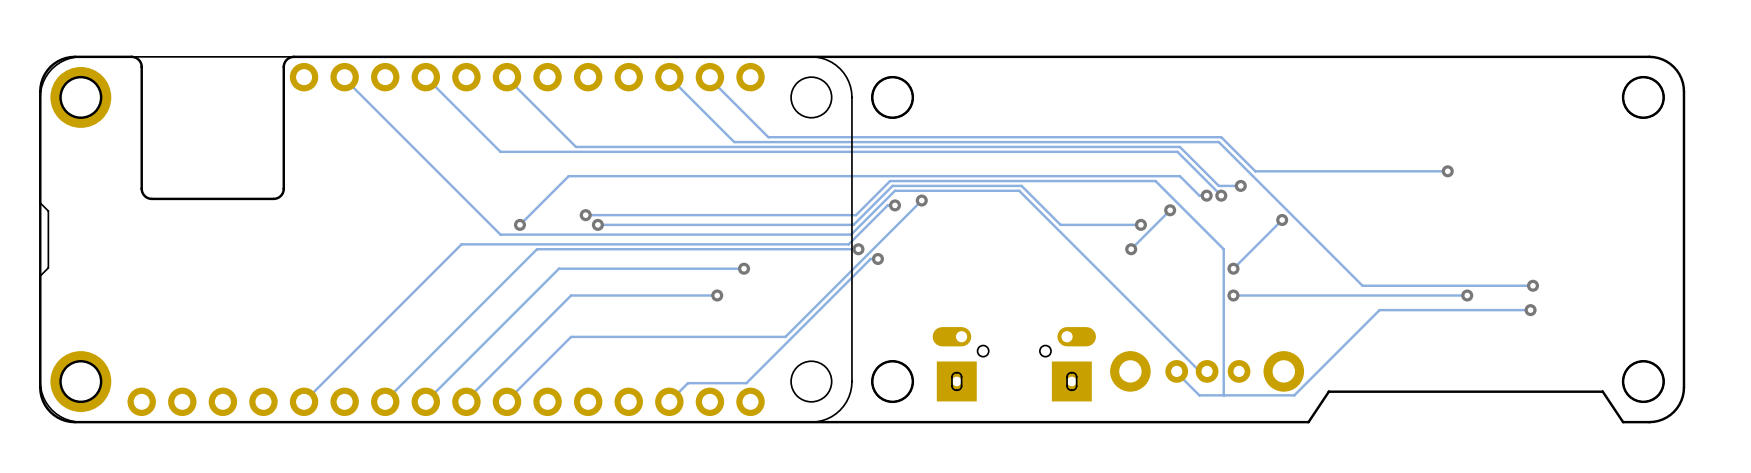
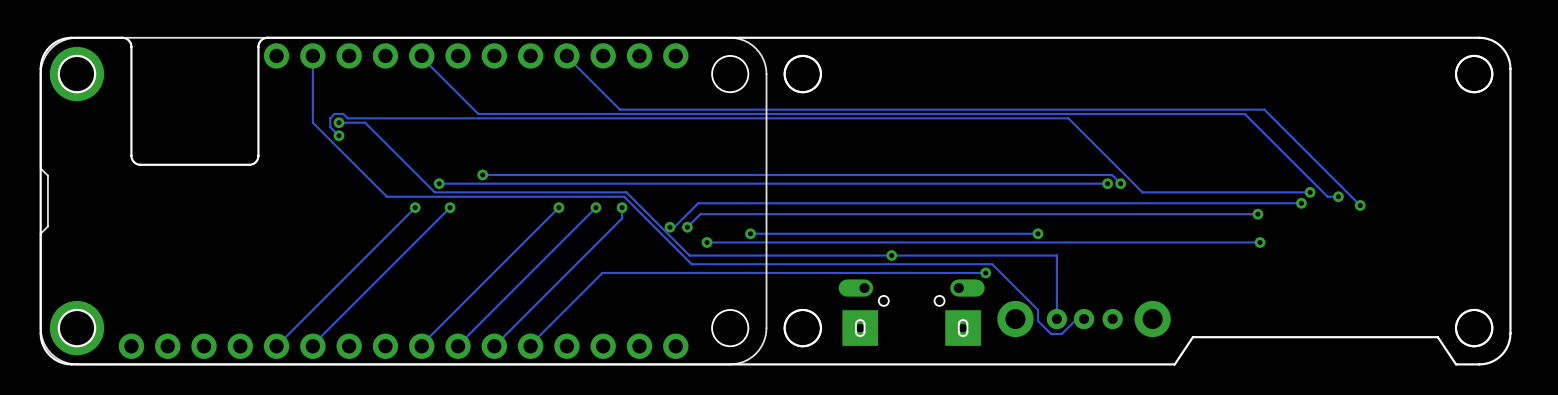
track: (425, 77) (500, 151) (1177, 151) (1221, 195) -> none
track: (506, 77) (575, 146) -> (339, 135) (330, 127) (330, 118) (334, 114) (343, 114) (347, 118) (519, 118)
track: (669, 77) (734, 142) -> (421, 55) (478, 114) (661, 114)
track: (709, 77) (768, 137) -> (566, 55) (619, 109) (691, 109)
track: (344, 78) (500, 234) -> (312, 57) (312, 122) (386, 196) (452, 196)
track: (1221, 137) (1255, 171) (1447, 171) -> (1096, 109) (1264, 109) (1360, 205)
track: (1218, 142) (1362, 285) -> (1094, 114) (1244, 114) (1327, 196) (1338, 196)
track: (1179, 146) (1218, 185) (1240, 185) -> (1059, 118) (1068, 118) (1142, 192) (1310, 192)
via: none -> (339, 122)
via: none -> (339, 135)
via: (1447, 171) -> none
via: (1240, 185) -> none
track: (1206, 195) (1199, 195) (1179, 176) (568, 176) (519, 224) -> none
via: (1206, 195) -> none
via: (1221, 195) -> none
track: (921, 200) (785, 336) (571, 336) -> (595, 207) (515, 288)
via: (921, 200) -> none
track: (894, 205) (887, 205) (848, 244) (461, 244) (459, 246) -> none
via: (894, 205) -> none
track: none -> (482, 174) (1111, 174) (1120, 183)
via: none -> (482, 174)
track: (1170, 210) (1131, 249) -> none
via: (1170, 210) -> none
track: (585, 215) (856, 215) (890, 181) (1155, 181) (1223, 249) (1223, 395) -> none
via: (585, 215) -> none
via: none -> (439, 183)
track: none -> (1107, 183) (439, 183)
via: none -> (1107, 183)
via: none -> (1120, 183)
track: (1282, 220) (1233, 268) -> none
via: (1282, 220) -> none
via: (519, 224) -> none
via: (597, 224) -> none
track: (1140, 224) (1060, 224) (1021, 185) (892, 185) (853, 224) (597, 224) -> none
via: (1140, 224) -> none
via: none -> (1310, 192)
track: (692, 234) (851, 234) (894, 190) (1019, 190) (1199, 370) (1207, 371) -> (624, 196) (691, 264) (992, 264) (1037, 309) (1037, 320) (1051, 333) (1061, 333) (1074, 320) (1083, 320) (1084, 319)
via: none -> (1338, 196)
track: none -> (1301, 203) (698, 203) (674, 227)
via: none -> (1301, 203)
via: none -> (1360, 205)
via: none -> (415, 207)
track: none -> (450, 207) (312, 346)
via: none -> (450, 207)
via: none -> (558, 207)
via: none -> (595, 207)
track: none -> (622, 207) (622, 218) (494, 346)
via: none -> (622, 207)
track: (858, 249) (537, 249) (385, 401) -> none
via: (858, 249) -> none
via: (1131, 249) -> none
track: none -> (1257, 214) (700, 214) (687, 227)
via: none -> (1257, 214)
track: (877, 258) (870, 258) (746, 383) (688, 383) (669, 401) -> none
via: (877, 258) -> none
track: (744, 268) (558, 268) (425, 401) -> none
via: none -> (687, 227)
via: (1233, 268) -> none
via: none -> (750, 233)
track: none -> (1037, 233) (750, 233)
via: none -> (1037, 233)
via: none -> (706, 242)
track: none -> (1223, 242) (706, 242)
via: none -> (1260, 242)
track: (1532, 285) (1403, 285) -> none
via: (1532, 285) -> none
track: (717, 295) (571, 295) -> (558, 207) (515, 251)
via: (717, 295) -> none
via: (1233, 295) -> none
track: (1467, 295) (1233, 295) -> none
via: (1467, 295) -> none
via: none -> (891, 255)
track: (1530, 310) (1379, 310) (1294, 395) (1199, 395) (1176, 371) -> (339, 122) (365, 122) (434, 192) (626, 192) (689, 255) (1056, 255) (1056, 319)
via: (1530, 310) -> none
track: none -> (985, 272) (602, 272) (530, 346)
via: none -> (985, 272)

